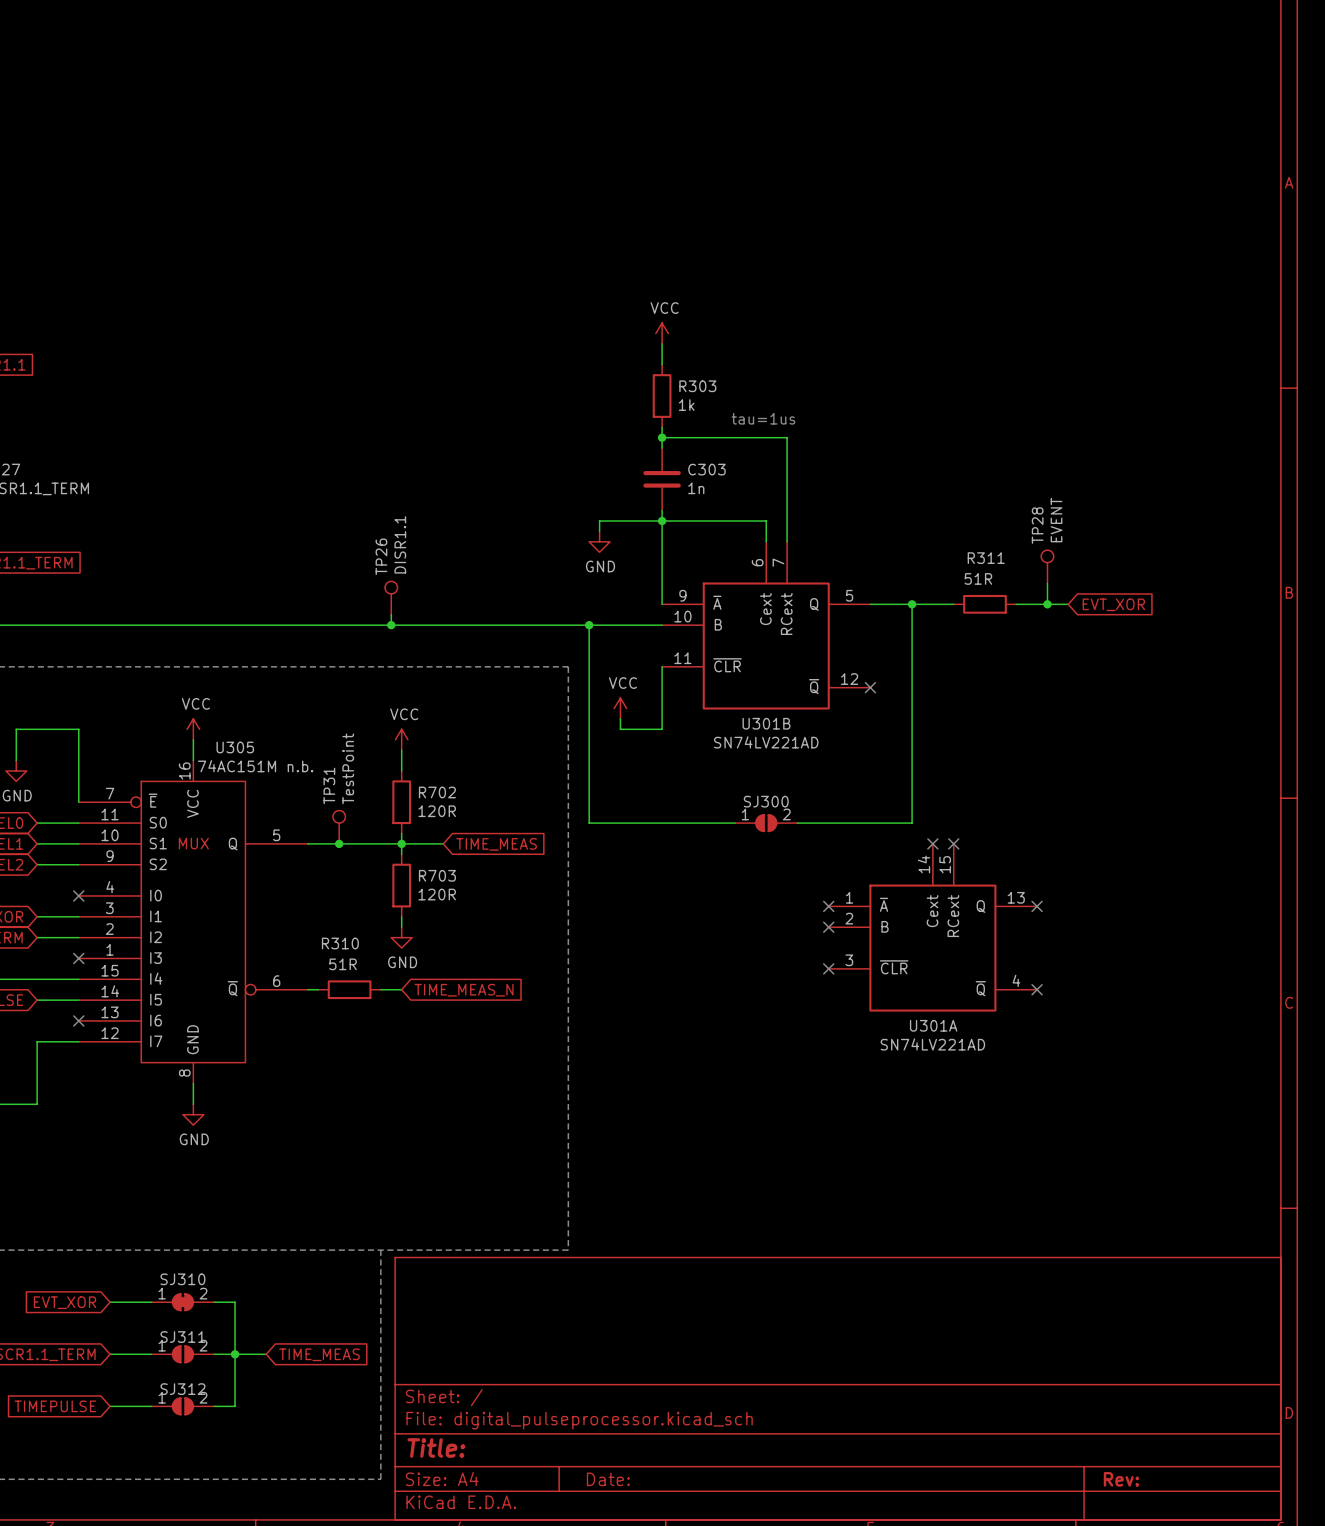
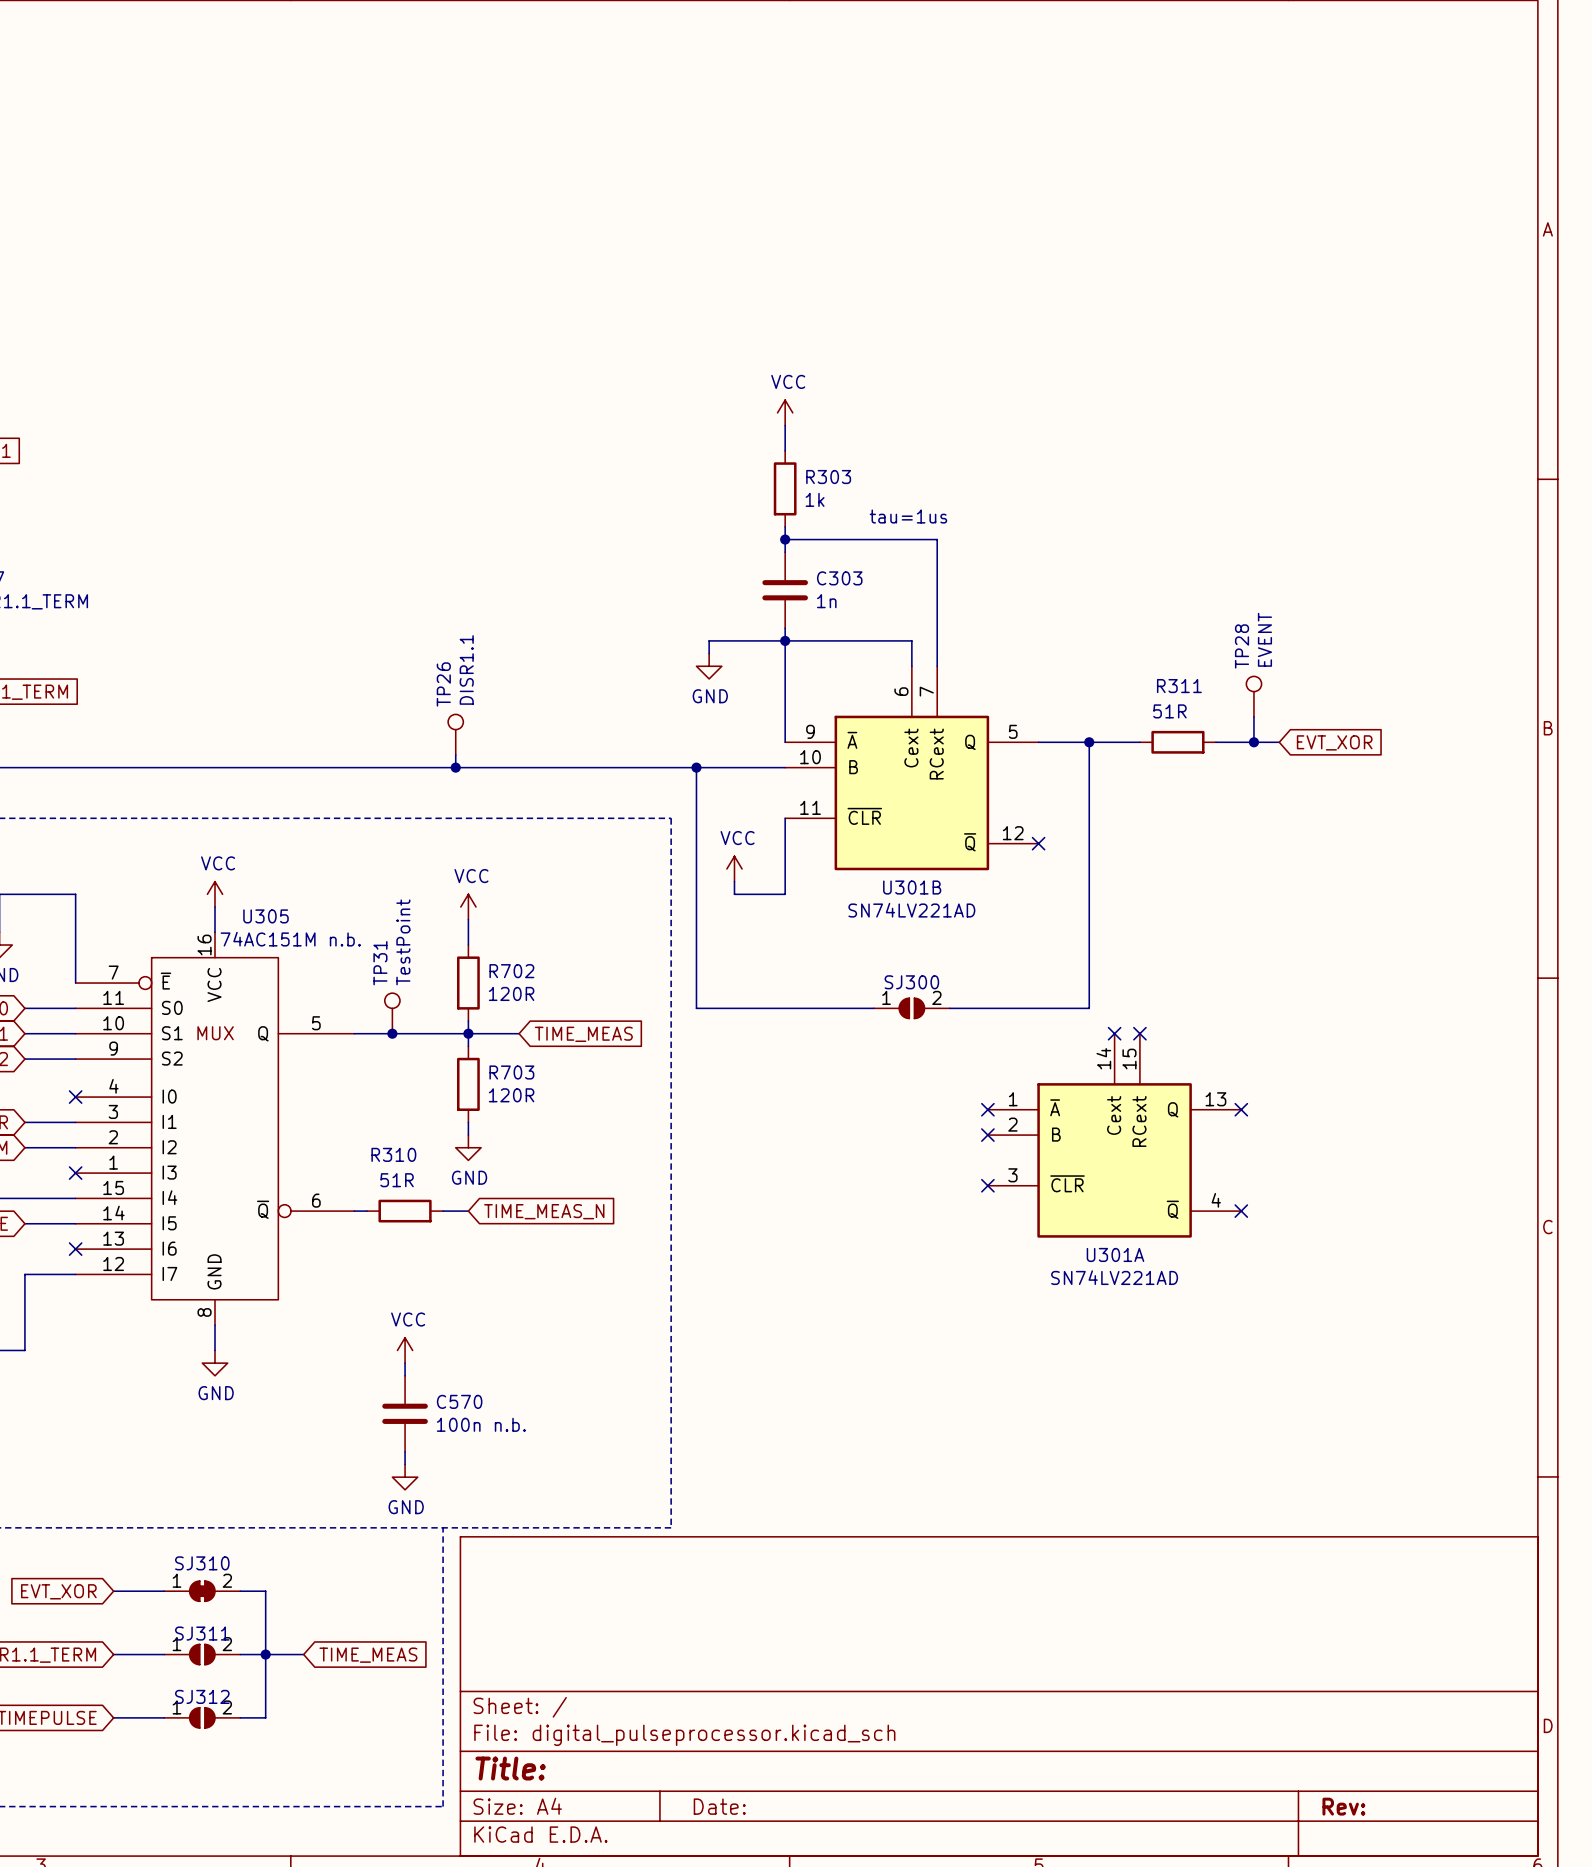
power symbol: none -> VCC (405, 1350)
wire: none -> (405, 1363) (405, 1375)
C570: none -> 100n n.b. (405, 1413)
wire: none -> (405, 1451) (405, 1464)
power symbol: none -> GND (405, 1477)

